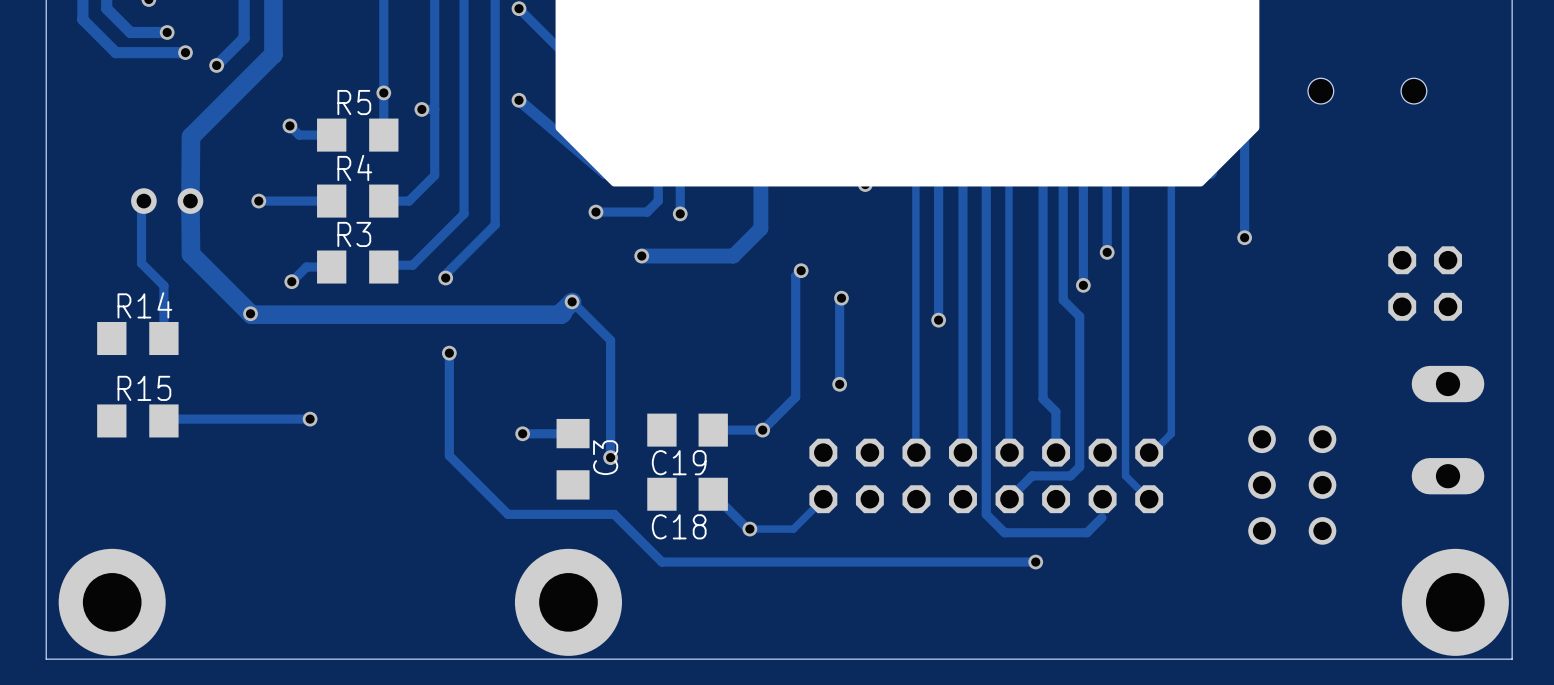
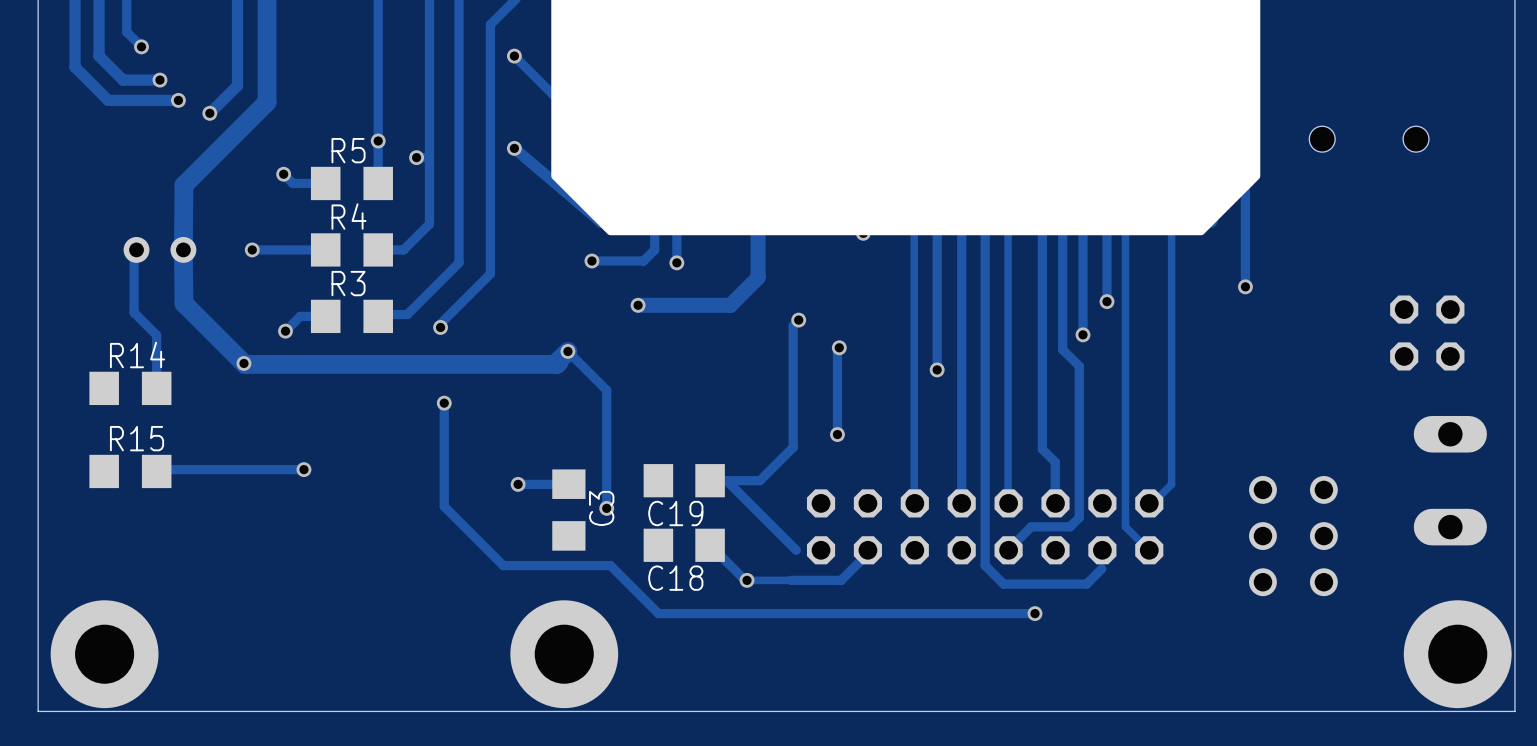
track: none -> (726, 480) (796, 550)
via: (762, 430) -> none
track: (823, 499) (793, 529) -> (867, 554) (841, 580) (790, 580)

